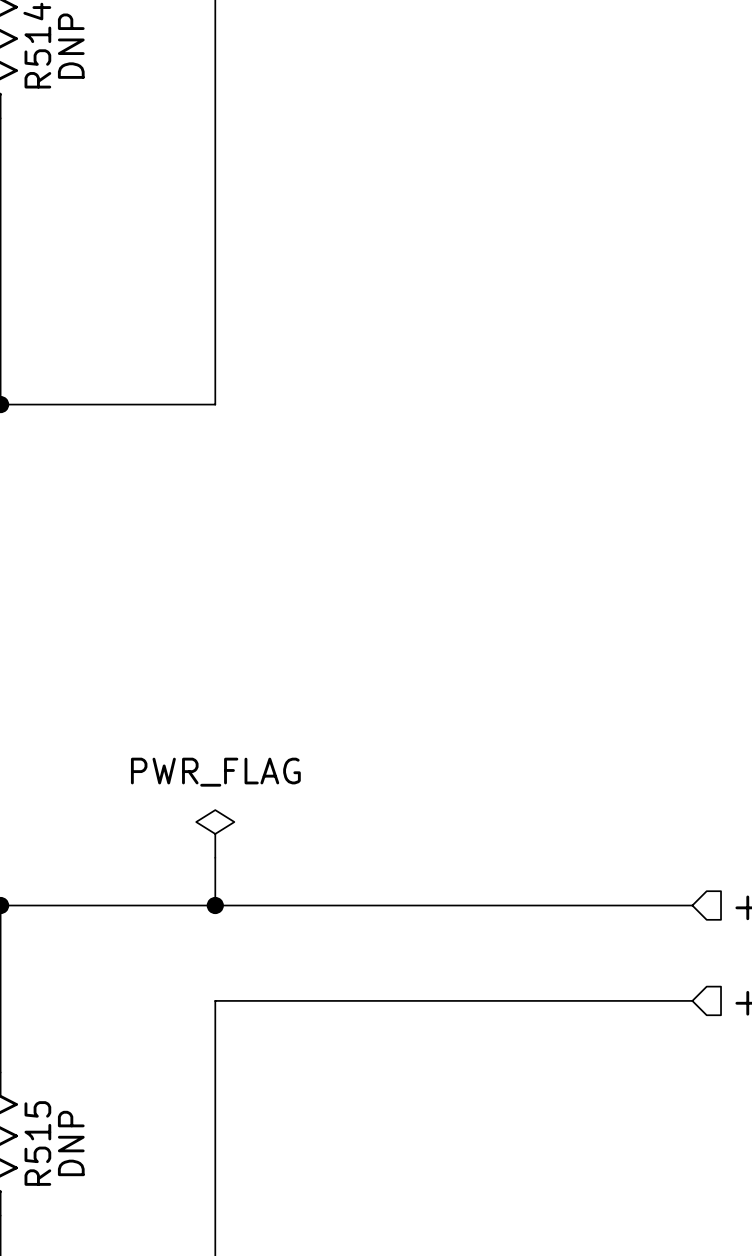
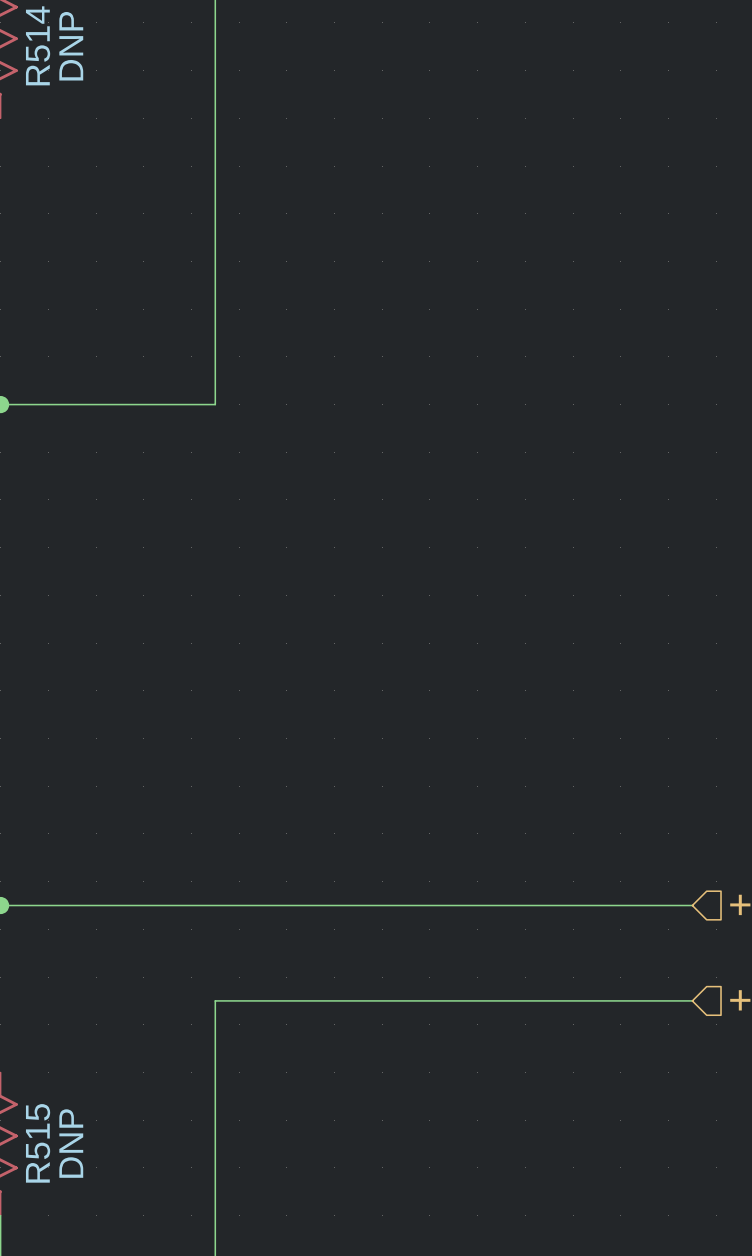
wire: (0, 118) (0, 404) -> none
power symbol: PWR_FLAG (215, 833) -> none
wire: (215, 857) (215, 905) -> none
wire: (0, 905) (0, 1072) -> none
junction: (215, 905) -> none

